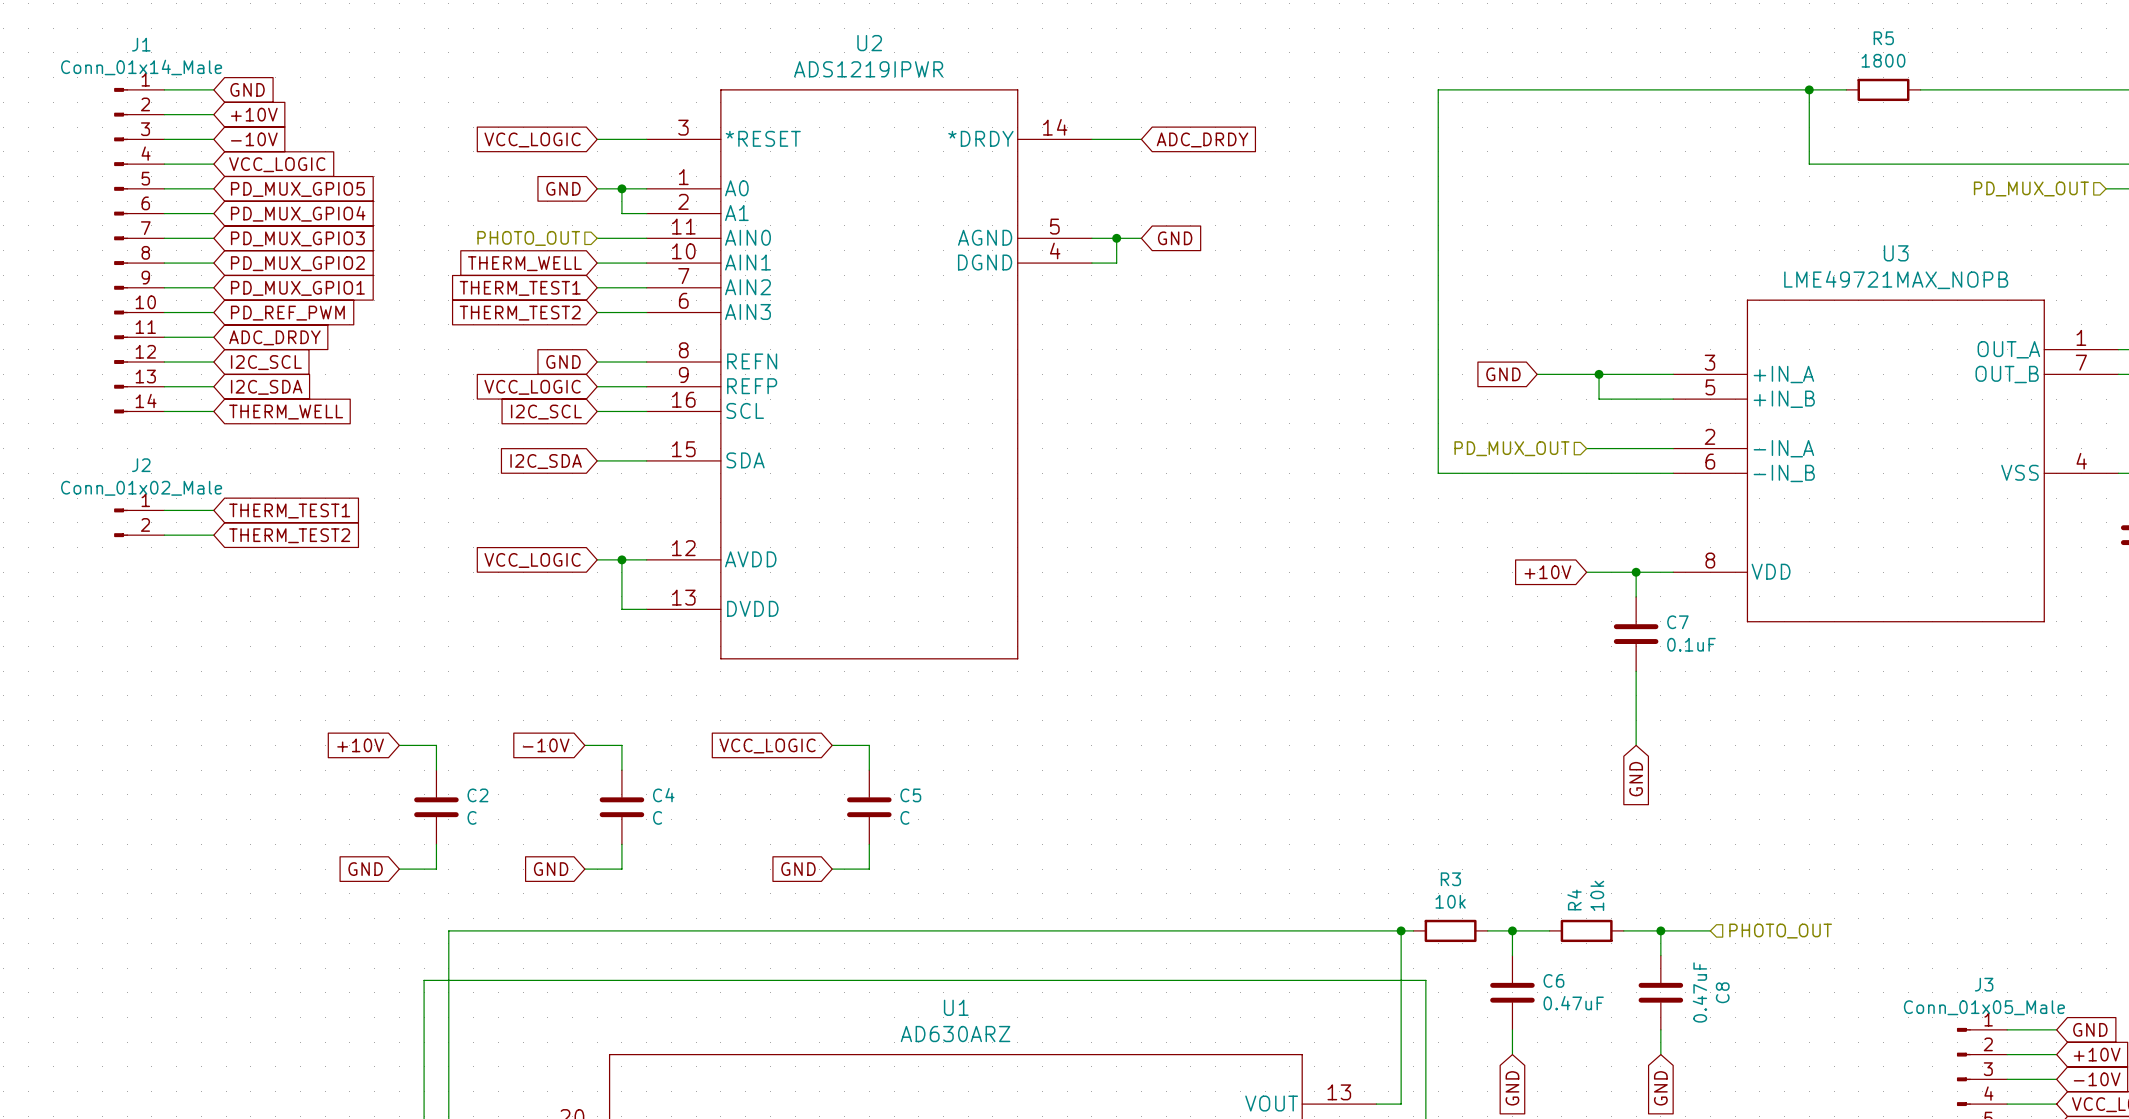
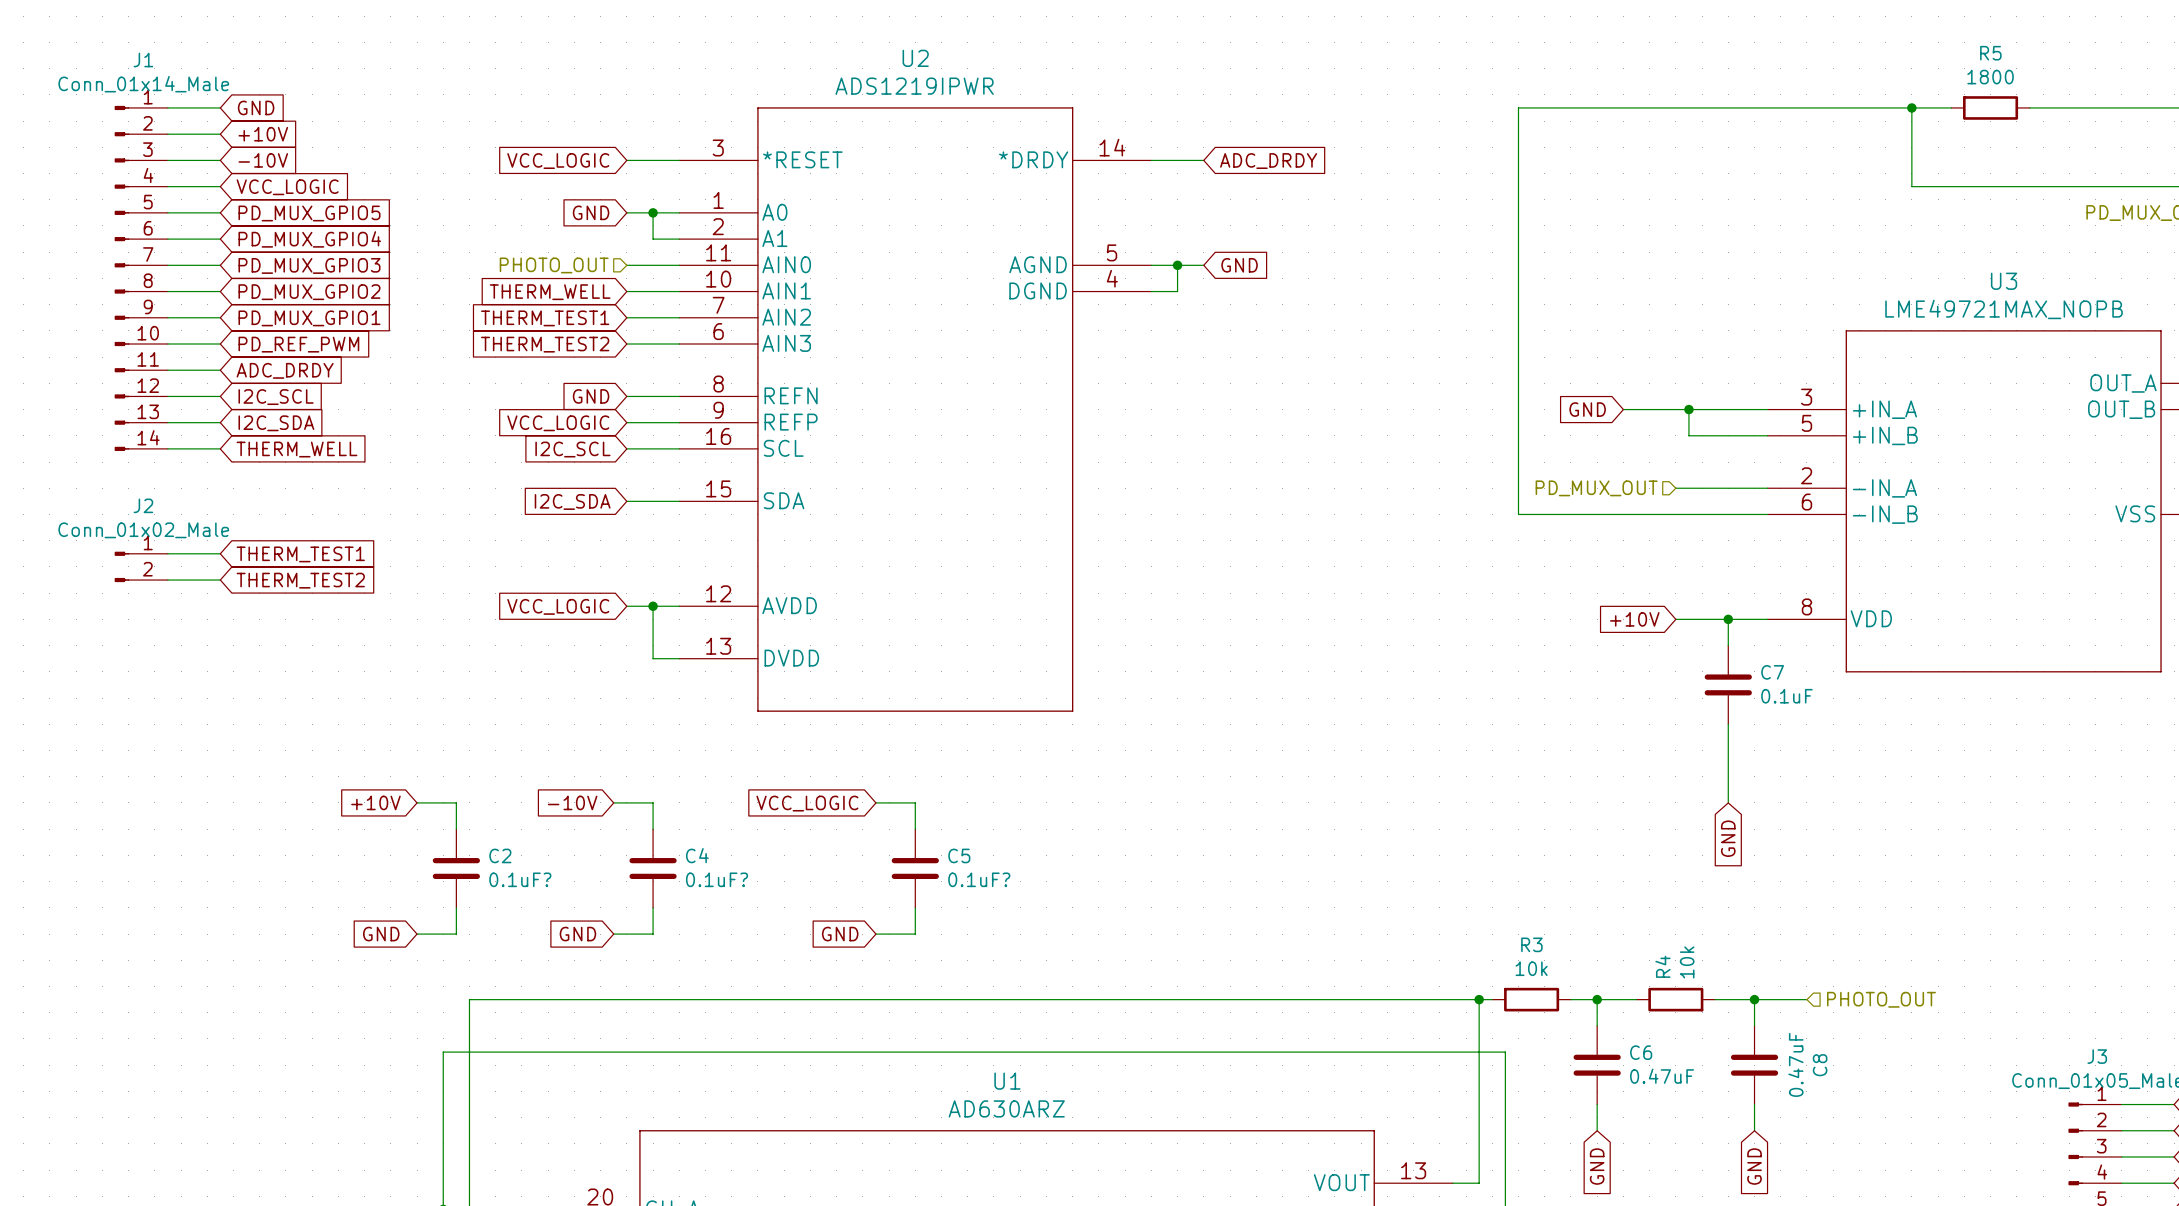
C2 value: C (472, 817) -> 0.1uF? (520, 879)
C4 value: C (657, 817) -> 0.1uF? (717, 879)
C5 value: C (904, 817) -> 0.1uF? (979, 879)

